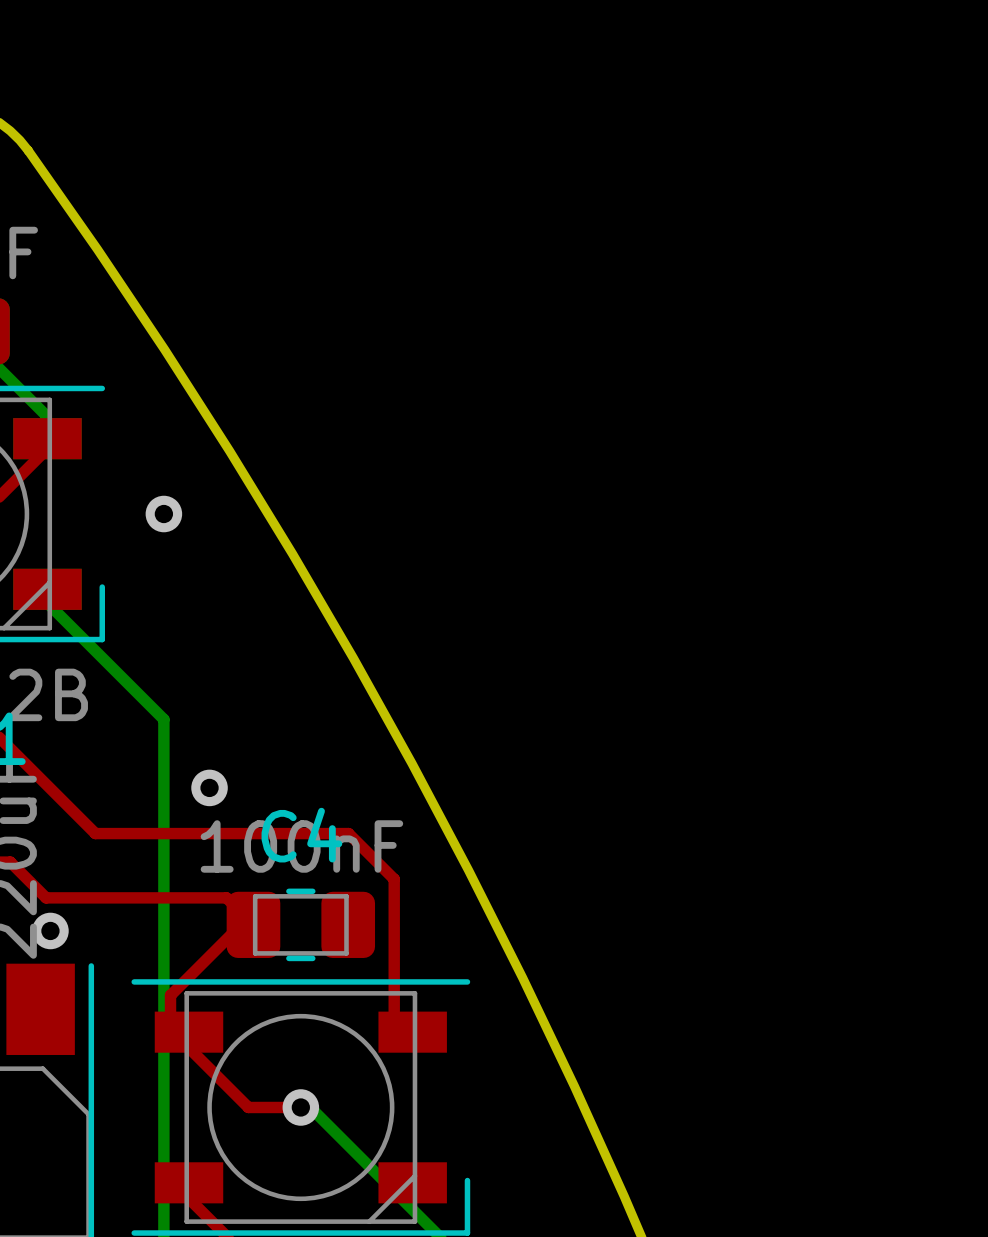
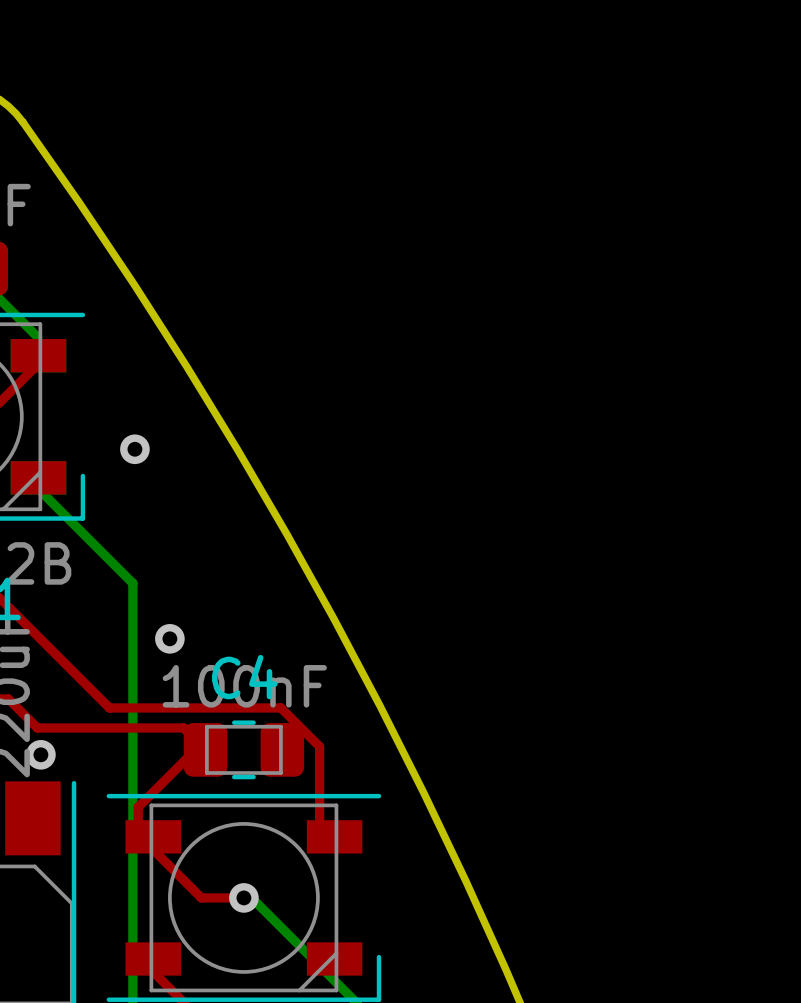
via position: (163, 514) -> (134, 449)
top track: (95, 833) (348, 833) (394, 879) (394, 920) -> (77, 675) (109, 707) (280, 707) (319, 746)

